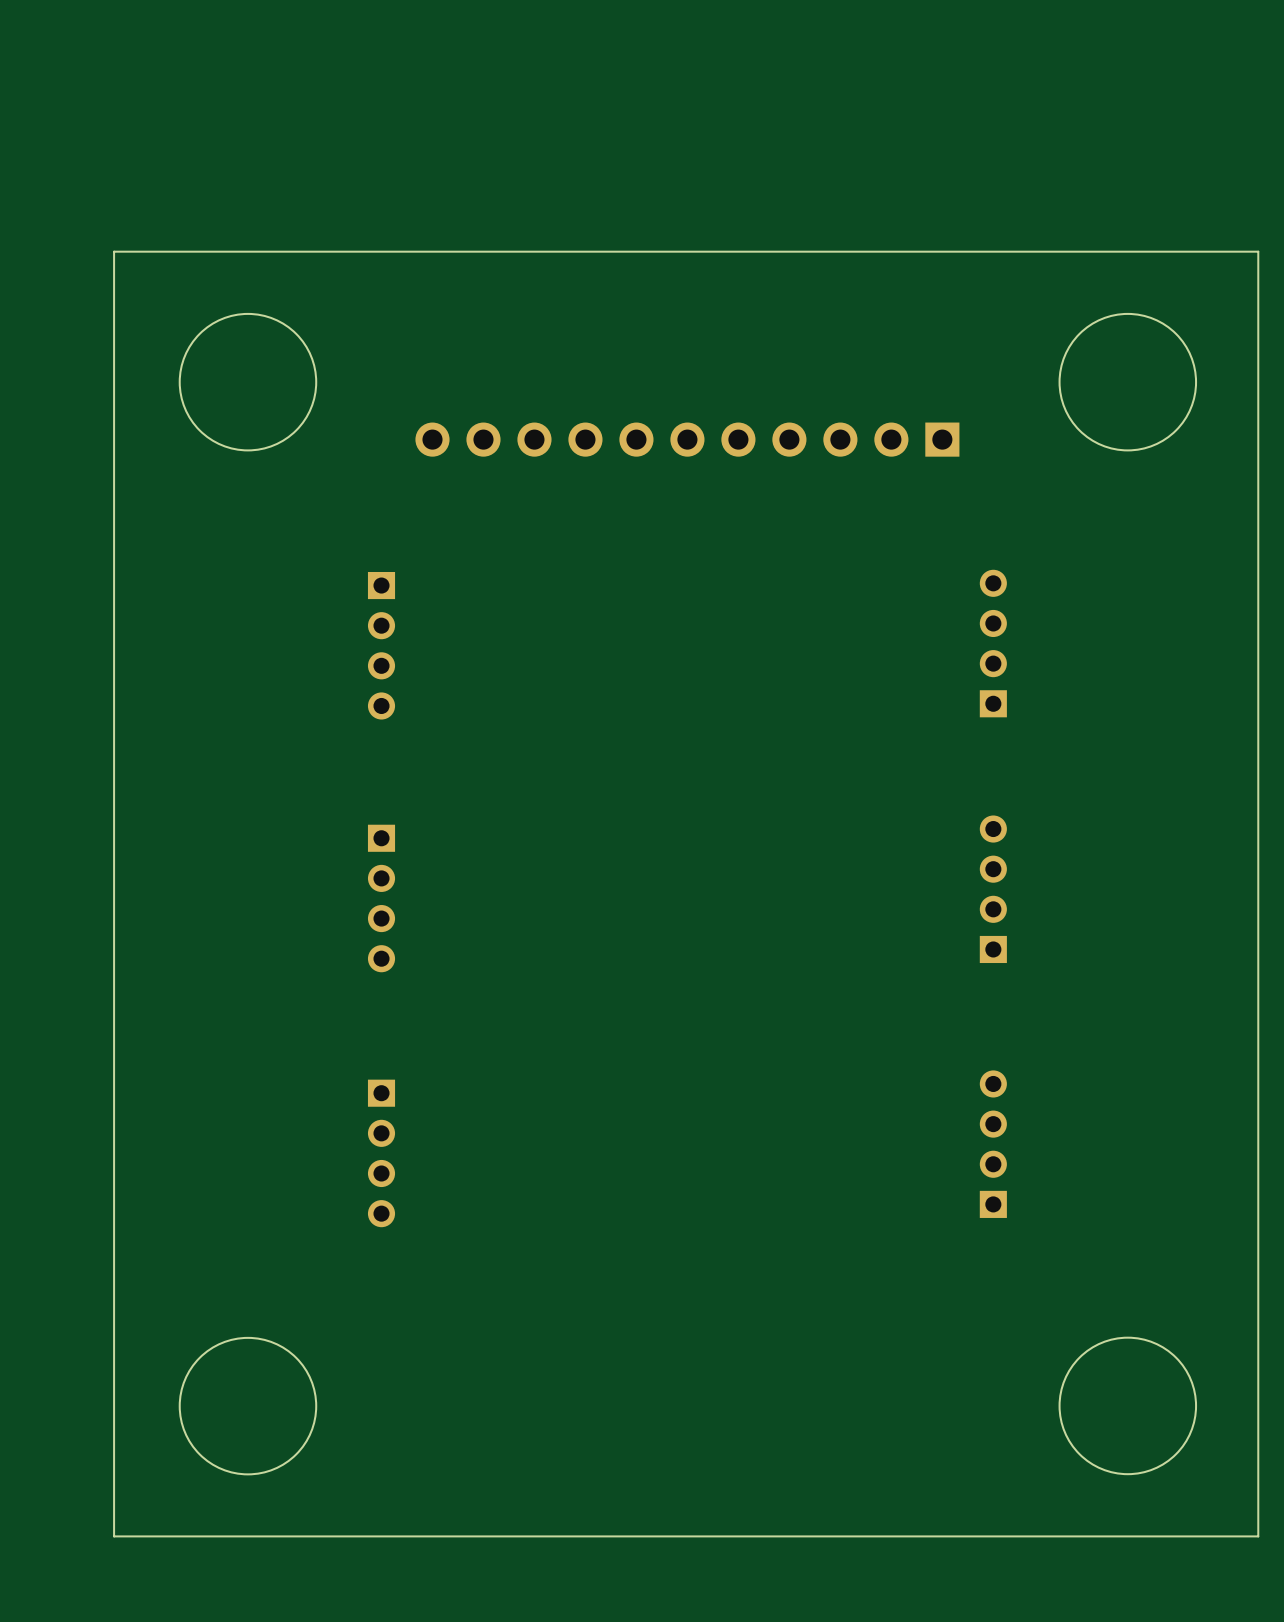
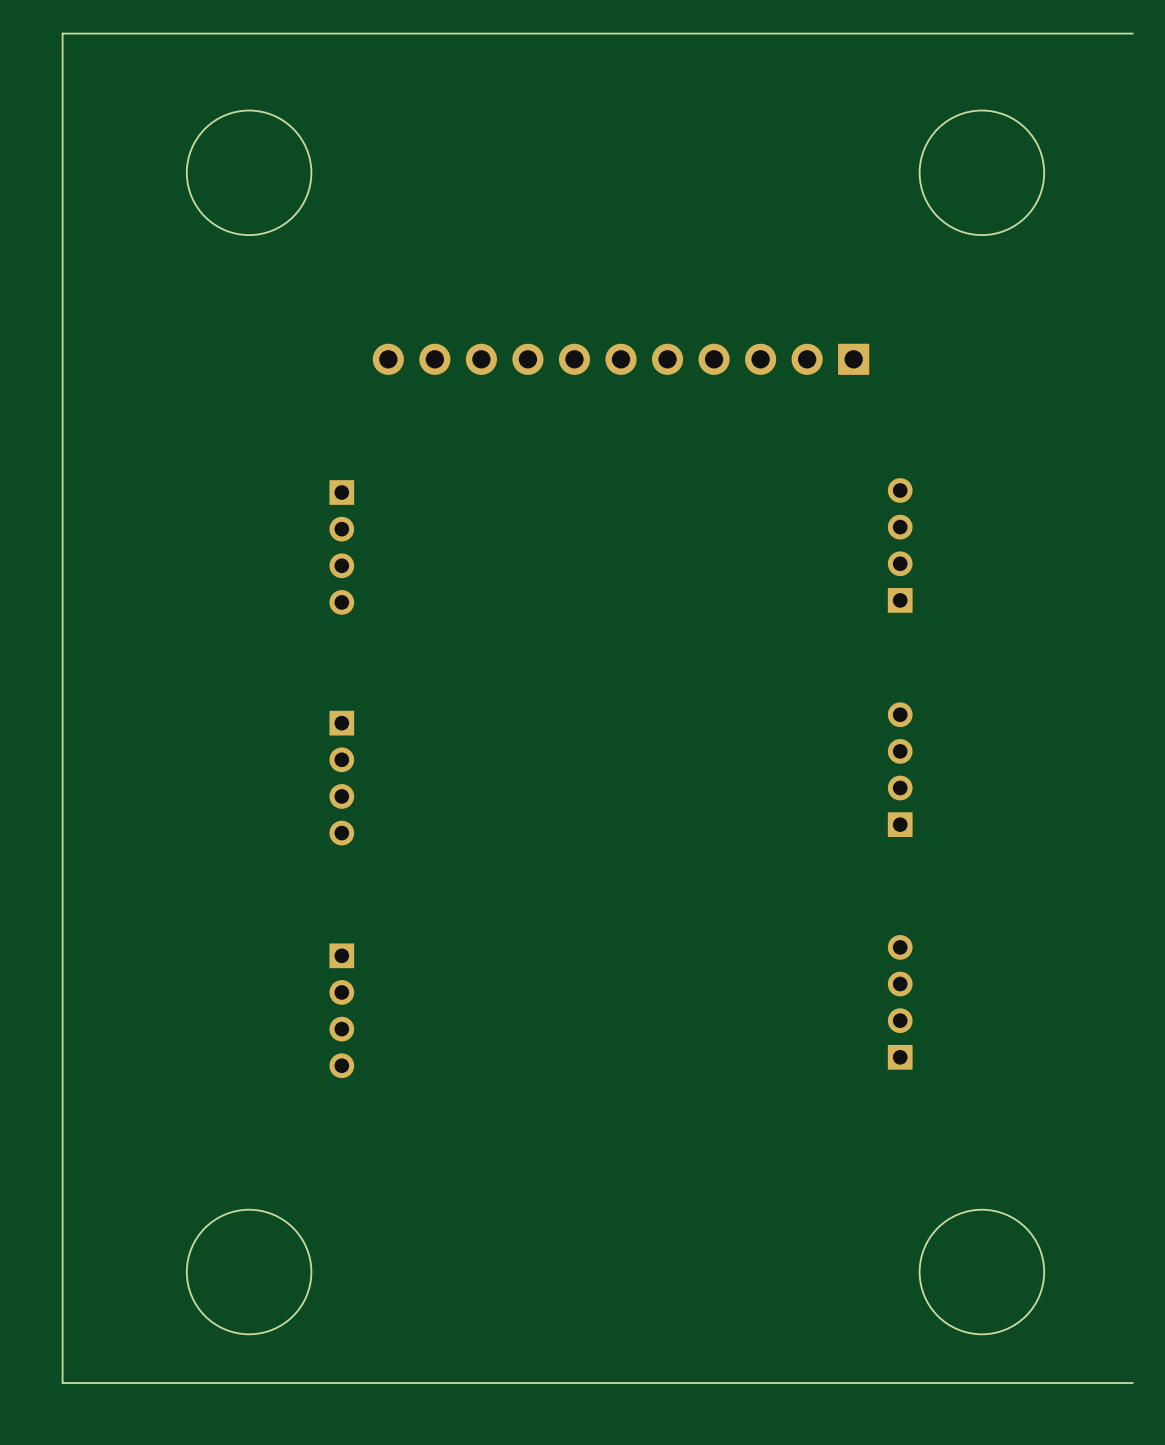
board edge: none -> (1132, 33) (62, 33) (62, 1383) (1132, 1383)
board edge: (1258, 251) (1258, 1536) (114, 1536) (114, 251) (1258, 251) -> none
round board edge position: (247, 382) -> (249, 172)
round board edge position: (1127, 382) -> (981, 172)
round board edge position: (1127, 1405) -> (981, 1272)
round board edge position: (247, 1406) -> (249, 1272)

